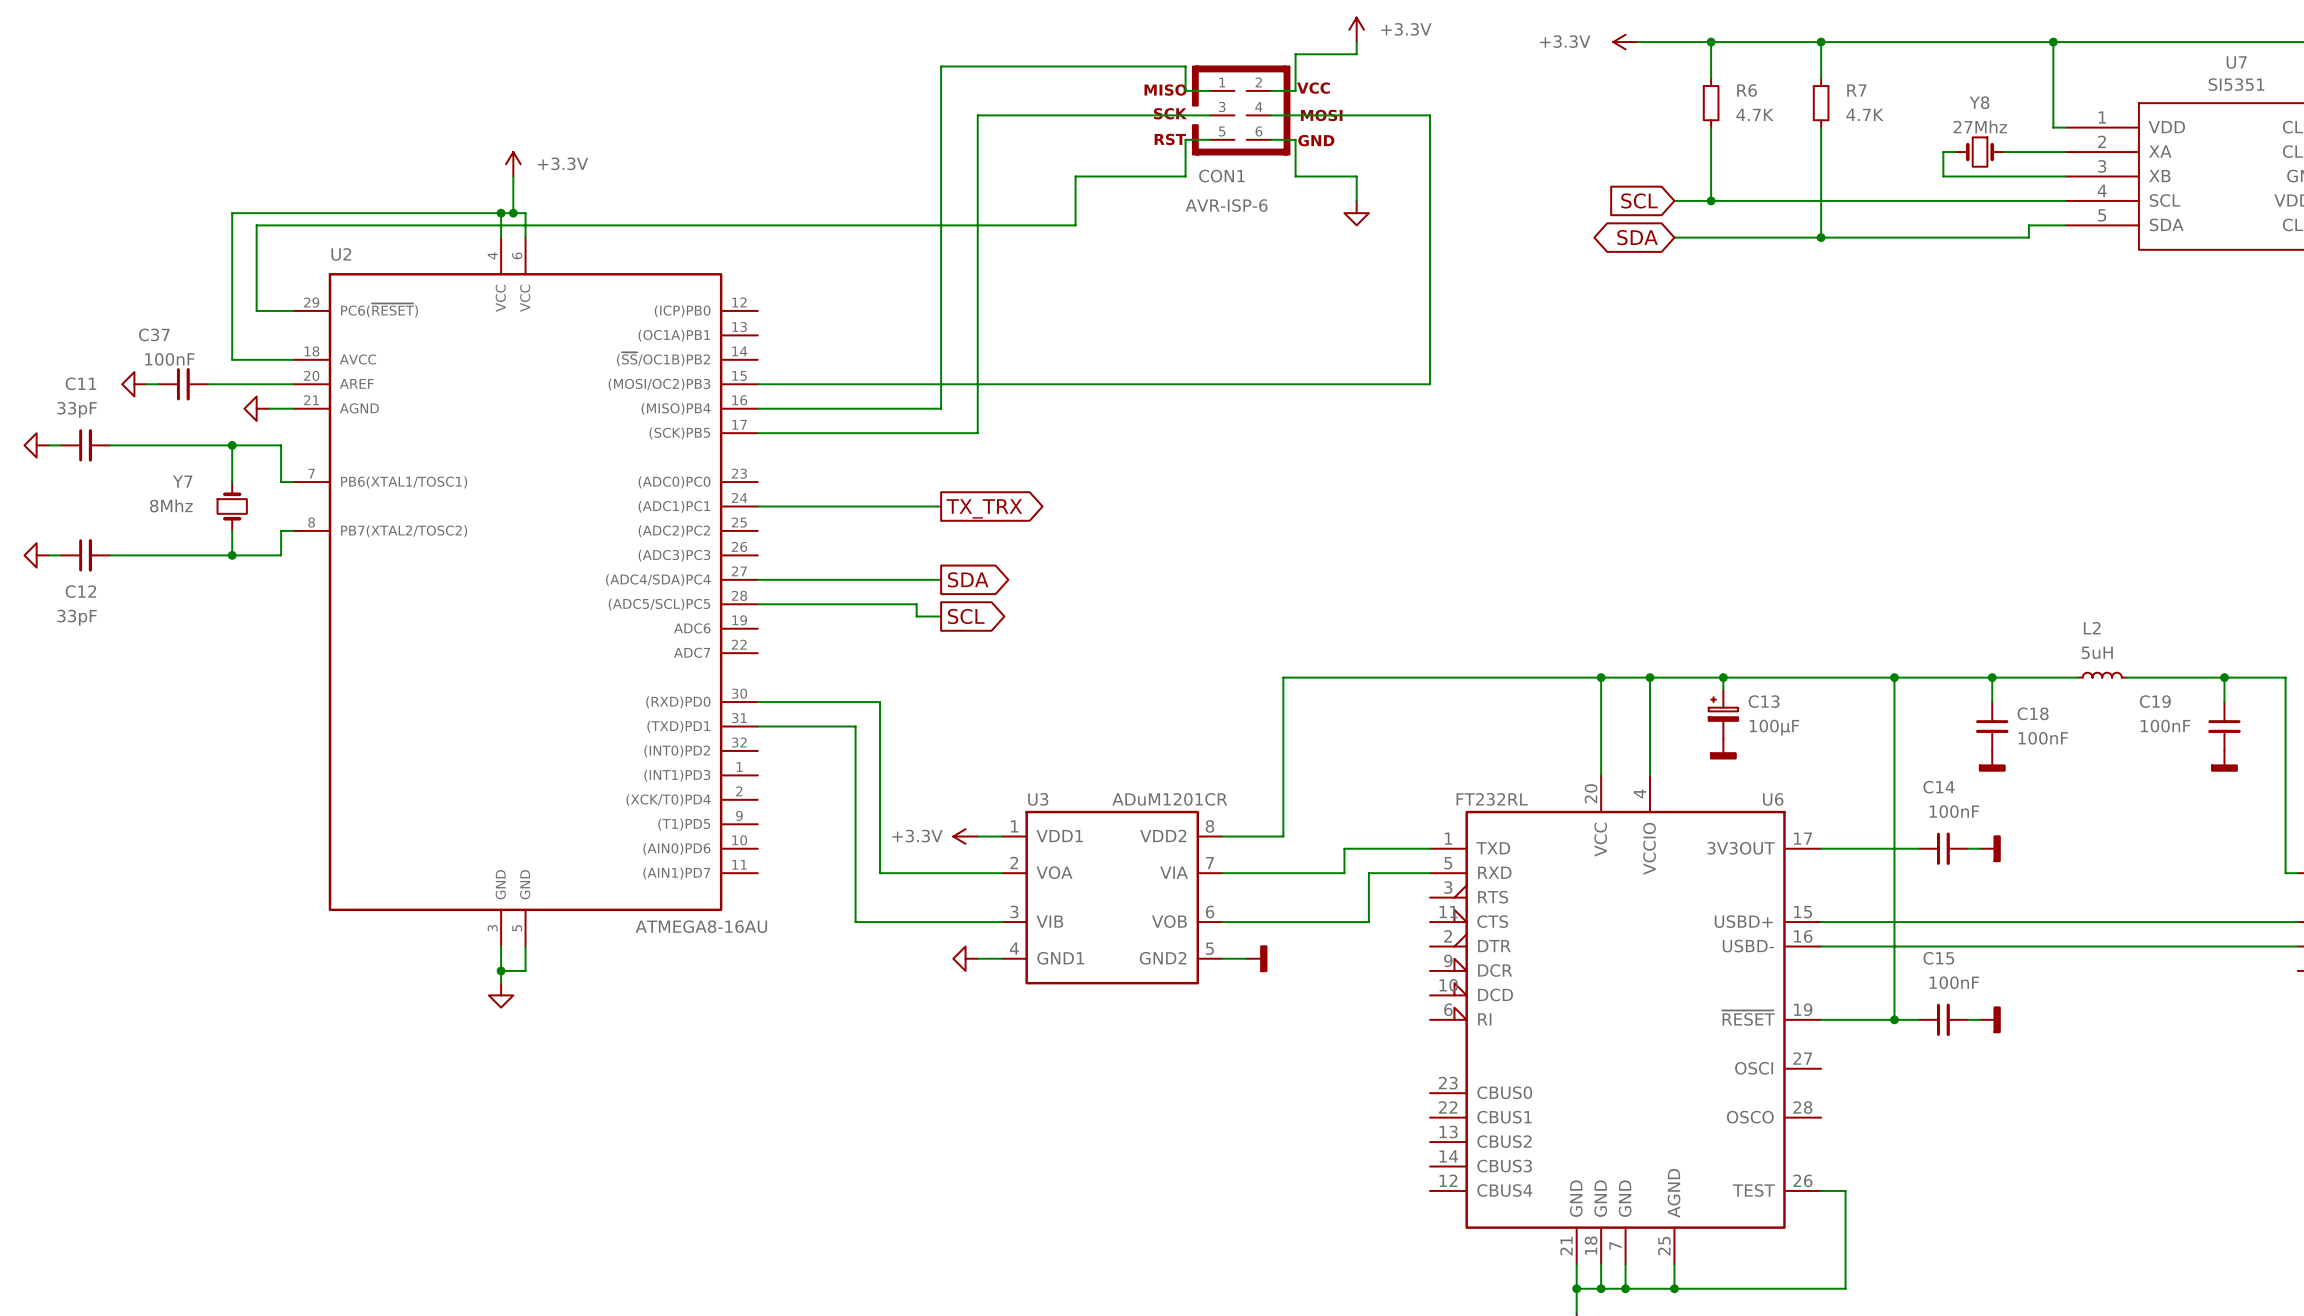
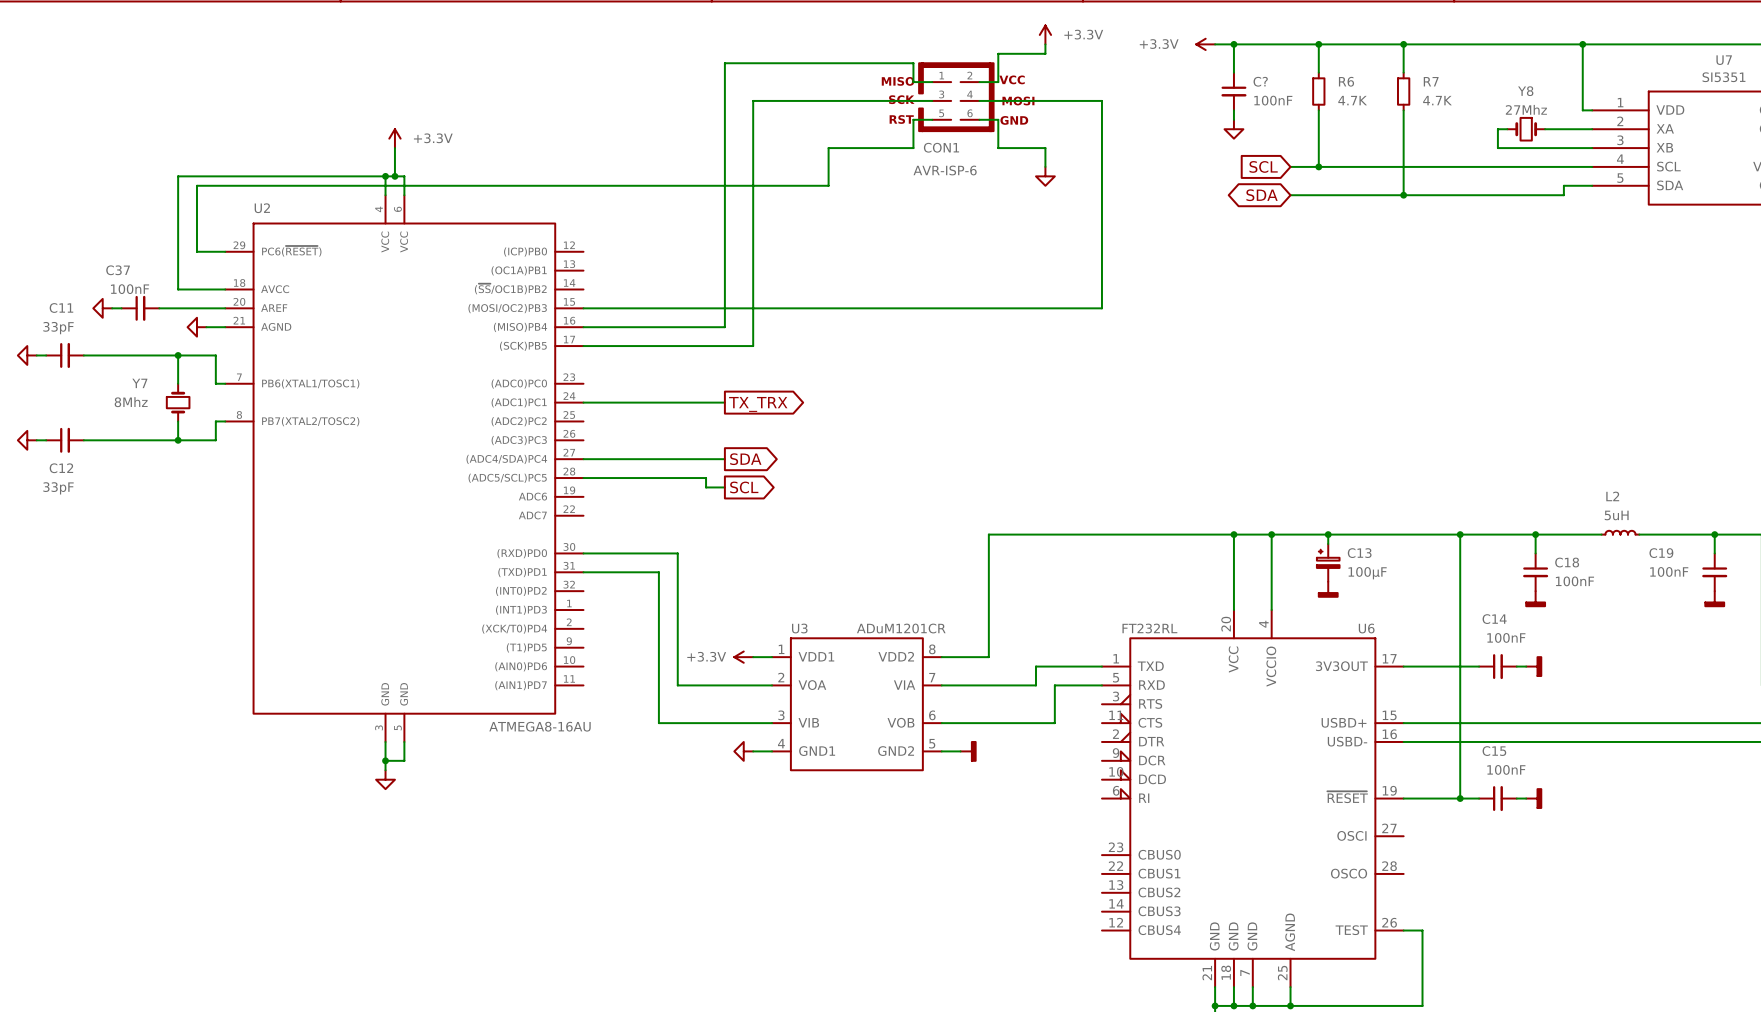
wire: none -> (1215, 44) (1262, 44)
wire: none -> (1233, 44) (1233, 72)
junction: none -> (1233, 44)
power symbol position: +3.3V (1625, 42) -> +3.3V (1205, 44)
C?: none -> 100nF (1233, 91)
wire: none -> (1233, 110) (1233, 119)
power symbol: none -> (1233, 129)

